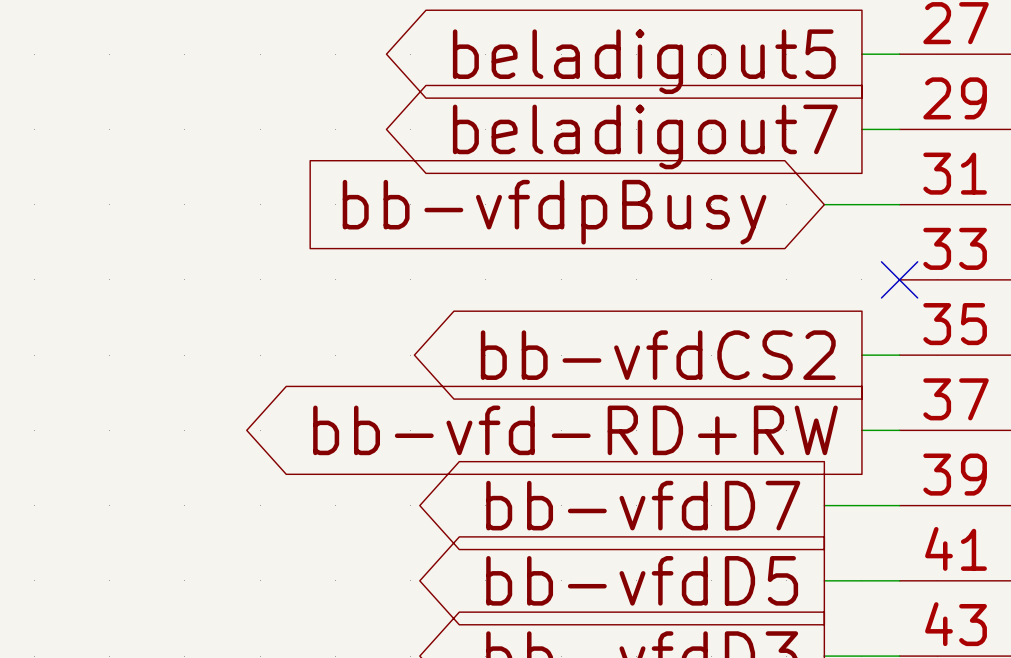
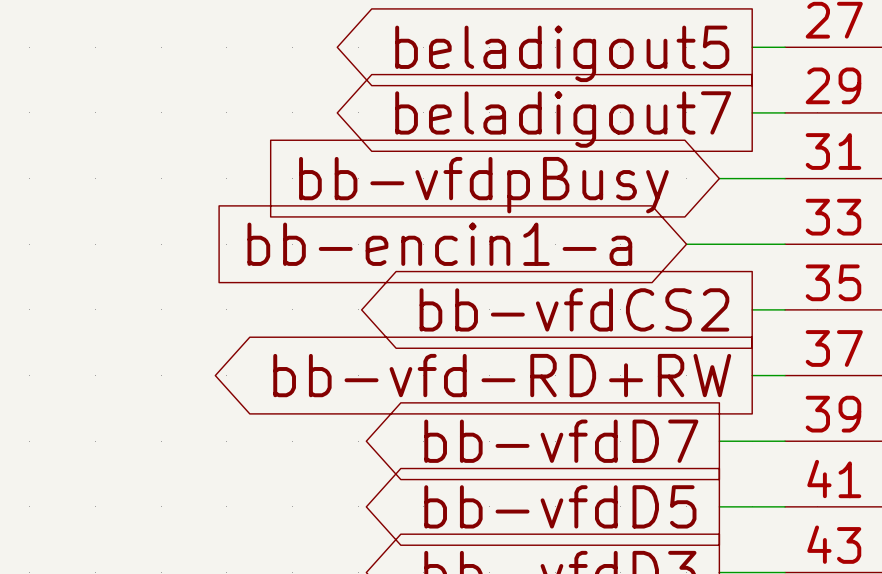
global label: none -> bb-encin1-a (439, 244)
wire: none -> (686, 244) (785, 244)
no-connect mark: (899, 279) -> none

